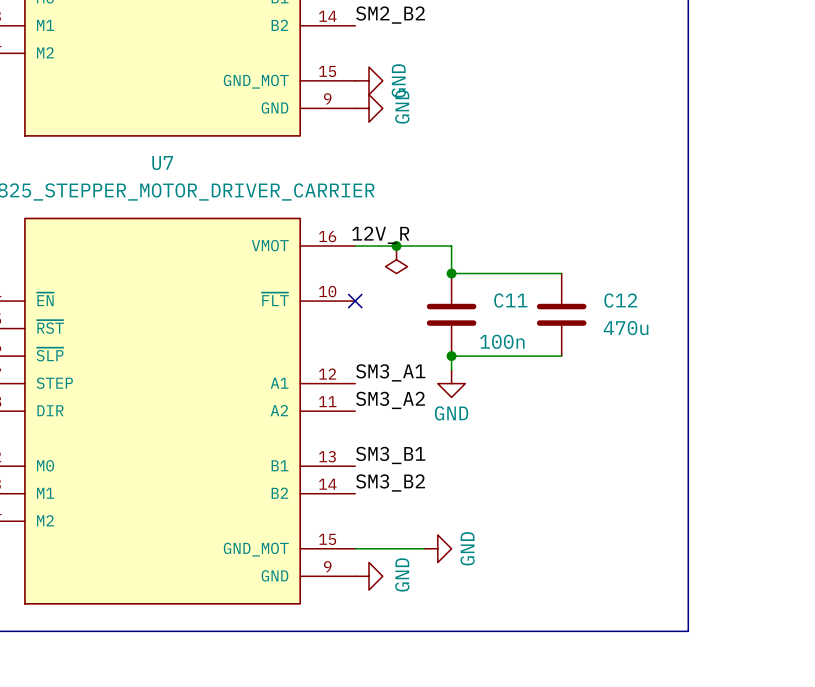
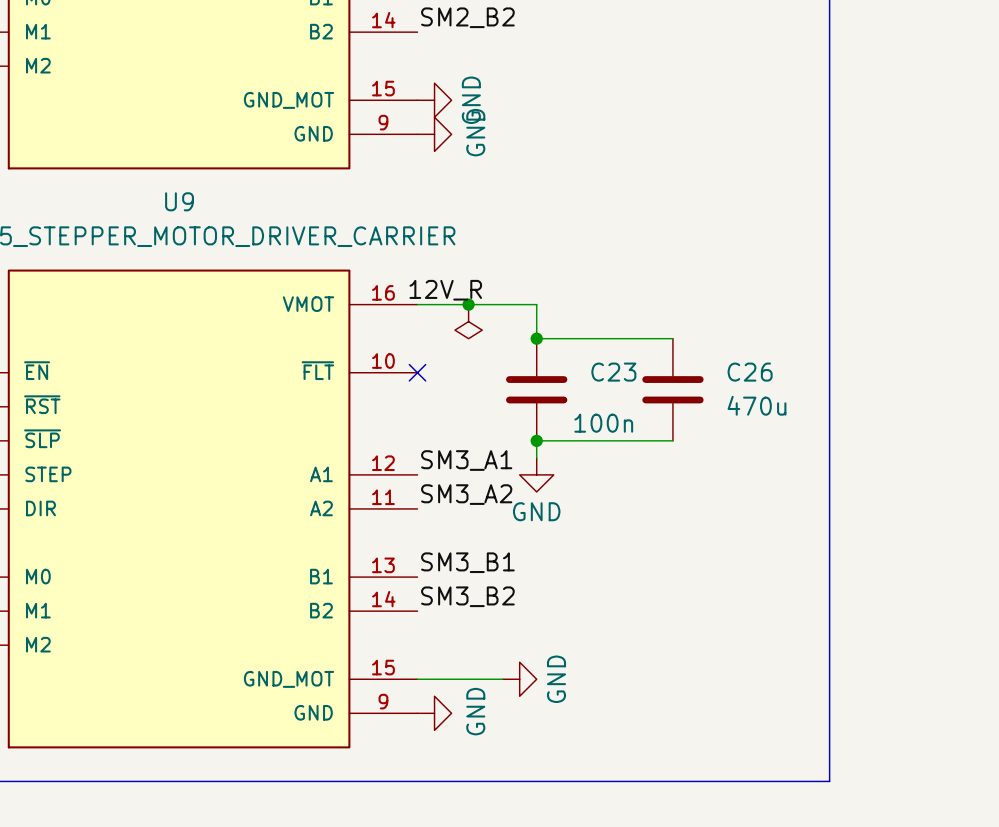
U7 name: U7 (162, 163) -> U9 (179, 201)
C11 name: C11 (510, 300) -> C23 (613, 372)
C12 name: C12 (620, 300) -> C26 (750, 372)

